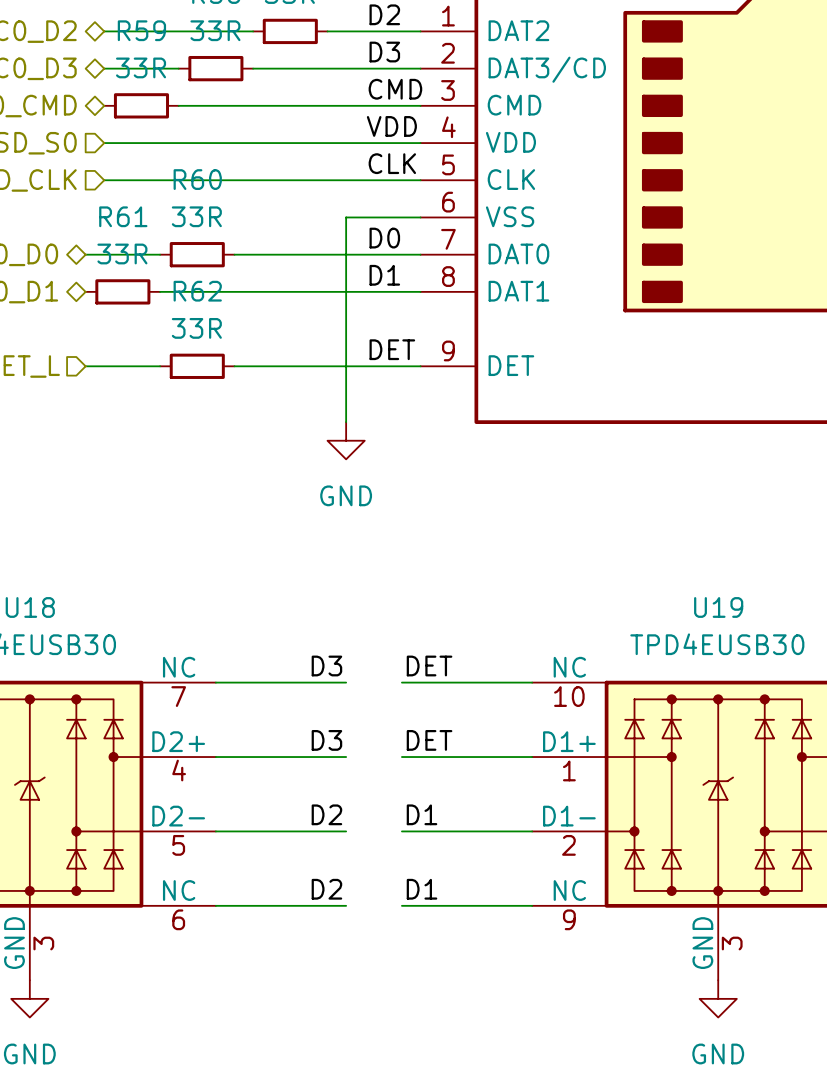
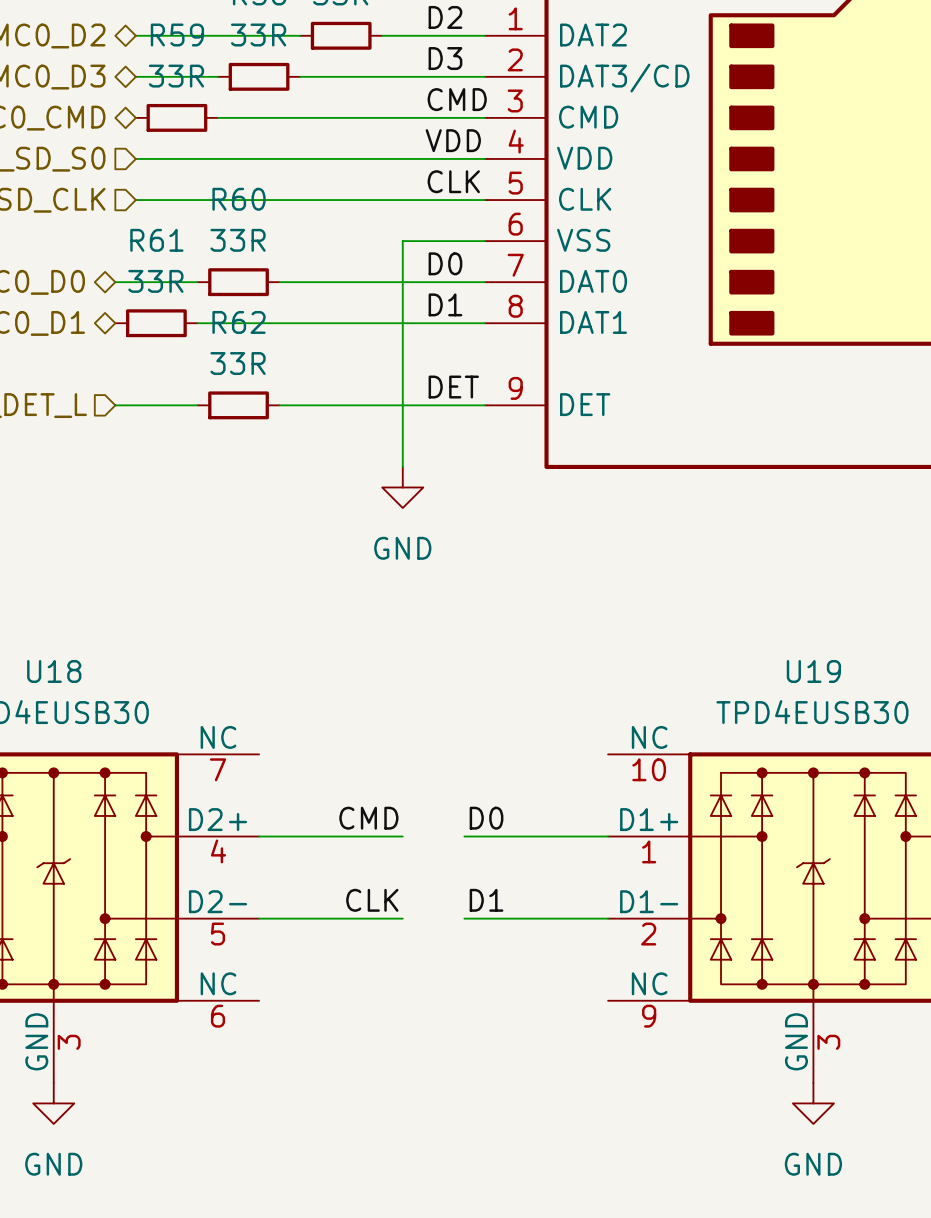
label: D3 (326, 665) -> none
label: DET (429, 665) -> none
wire: (215, 682) (346, 682) -> none
wire: (401, 682) (532, 682) -> none
label: D3 (326, 740) -> CMD (368, 818)
label: DET (429, 740) -> D0 (486, 818)
label: D2 (326, 814) -> CLK (372, 900)
label: D2 (326, 889) -> none
label: D1 (422, 889) -> none
wire: (215, 905) (346, 905) -> none
wire: (401, 905) (532, 905) -> none

